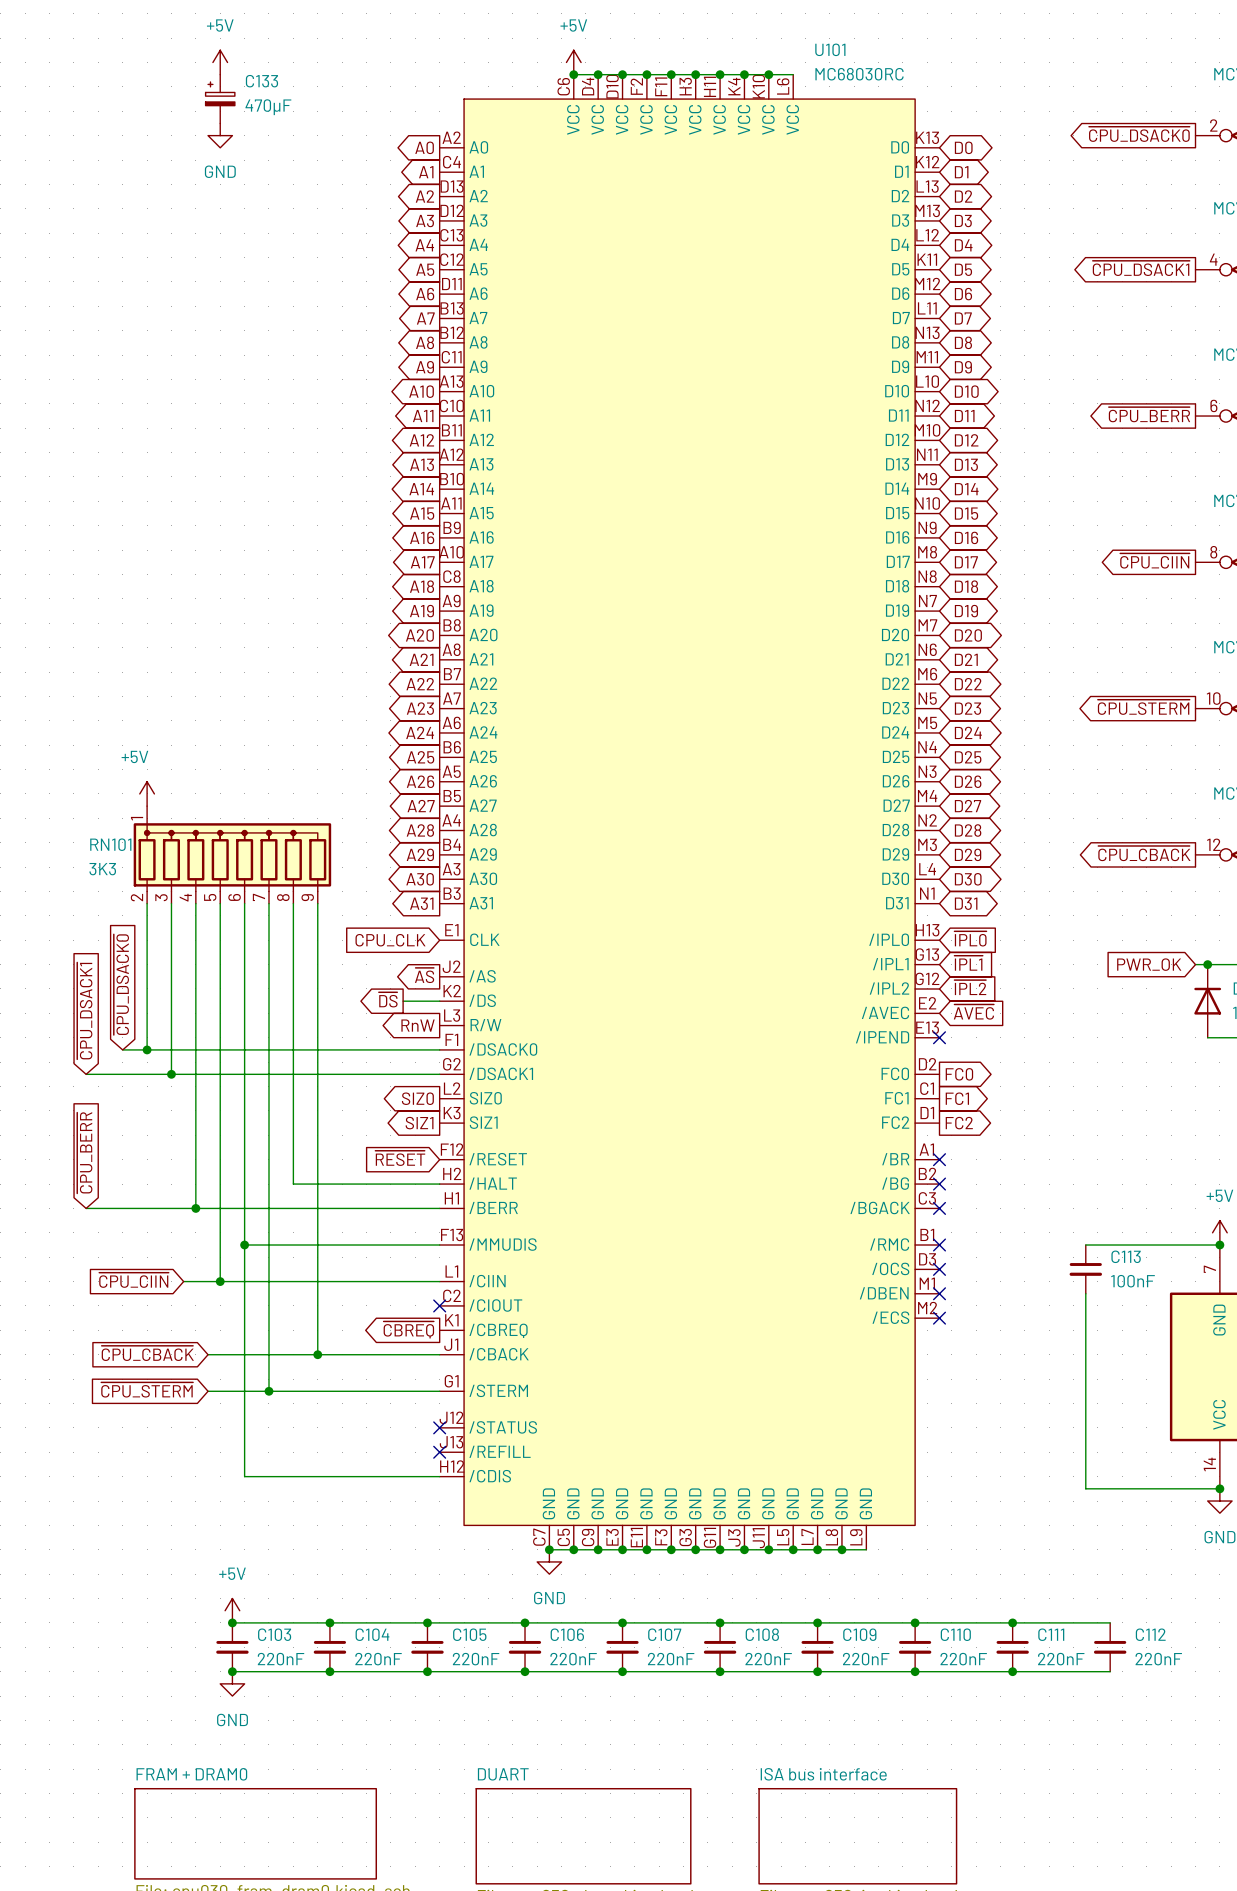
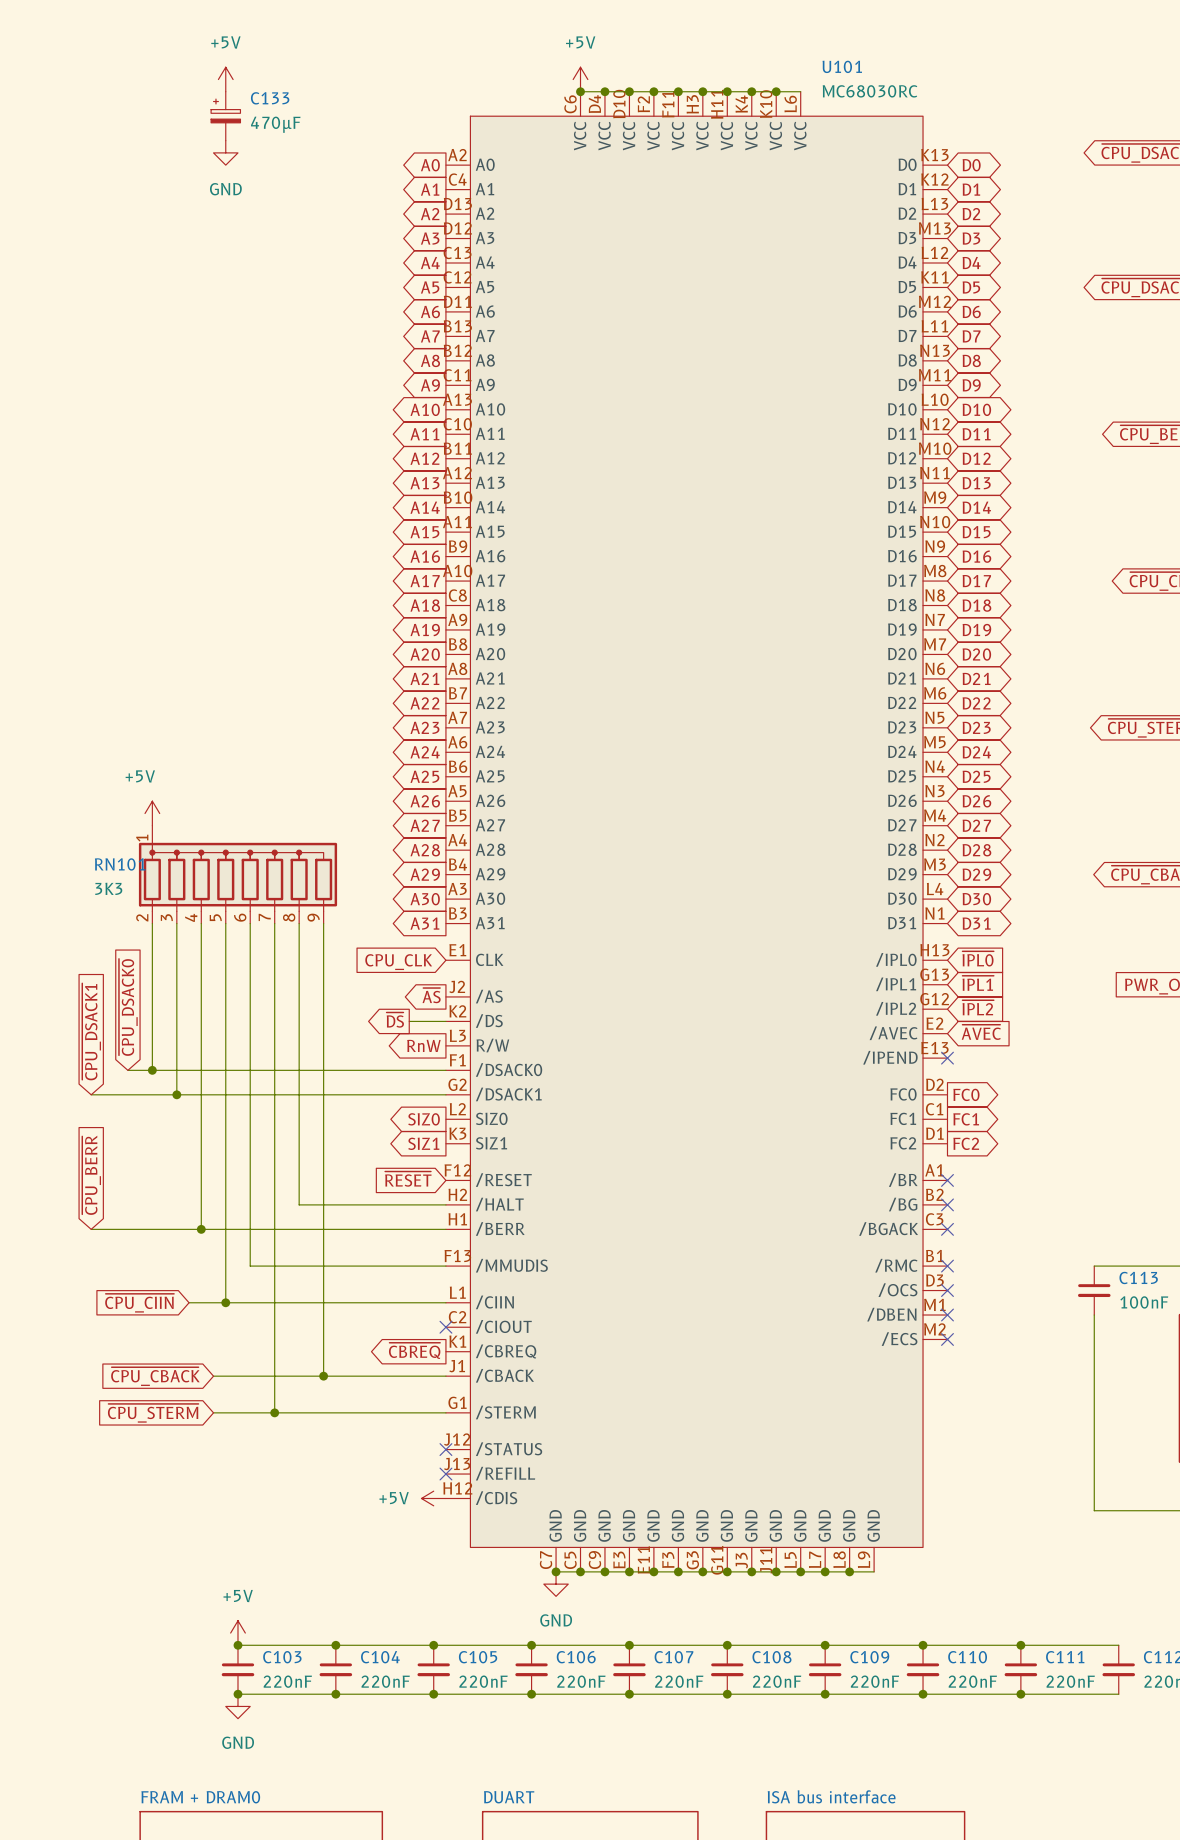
wire: (244, 1245) (244, 1476) (439, 1476) -> none
junction: (244, 1245) -> none
power symbol: none -> +5V (433, 1498)

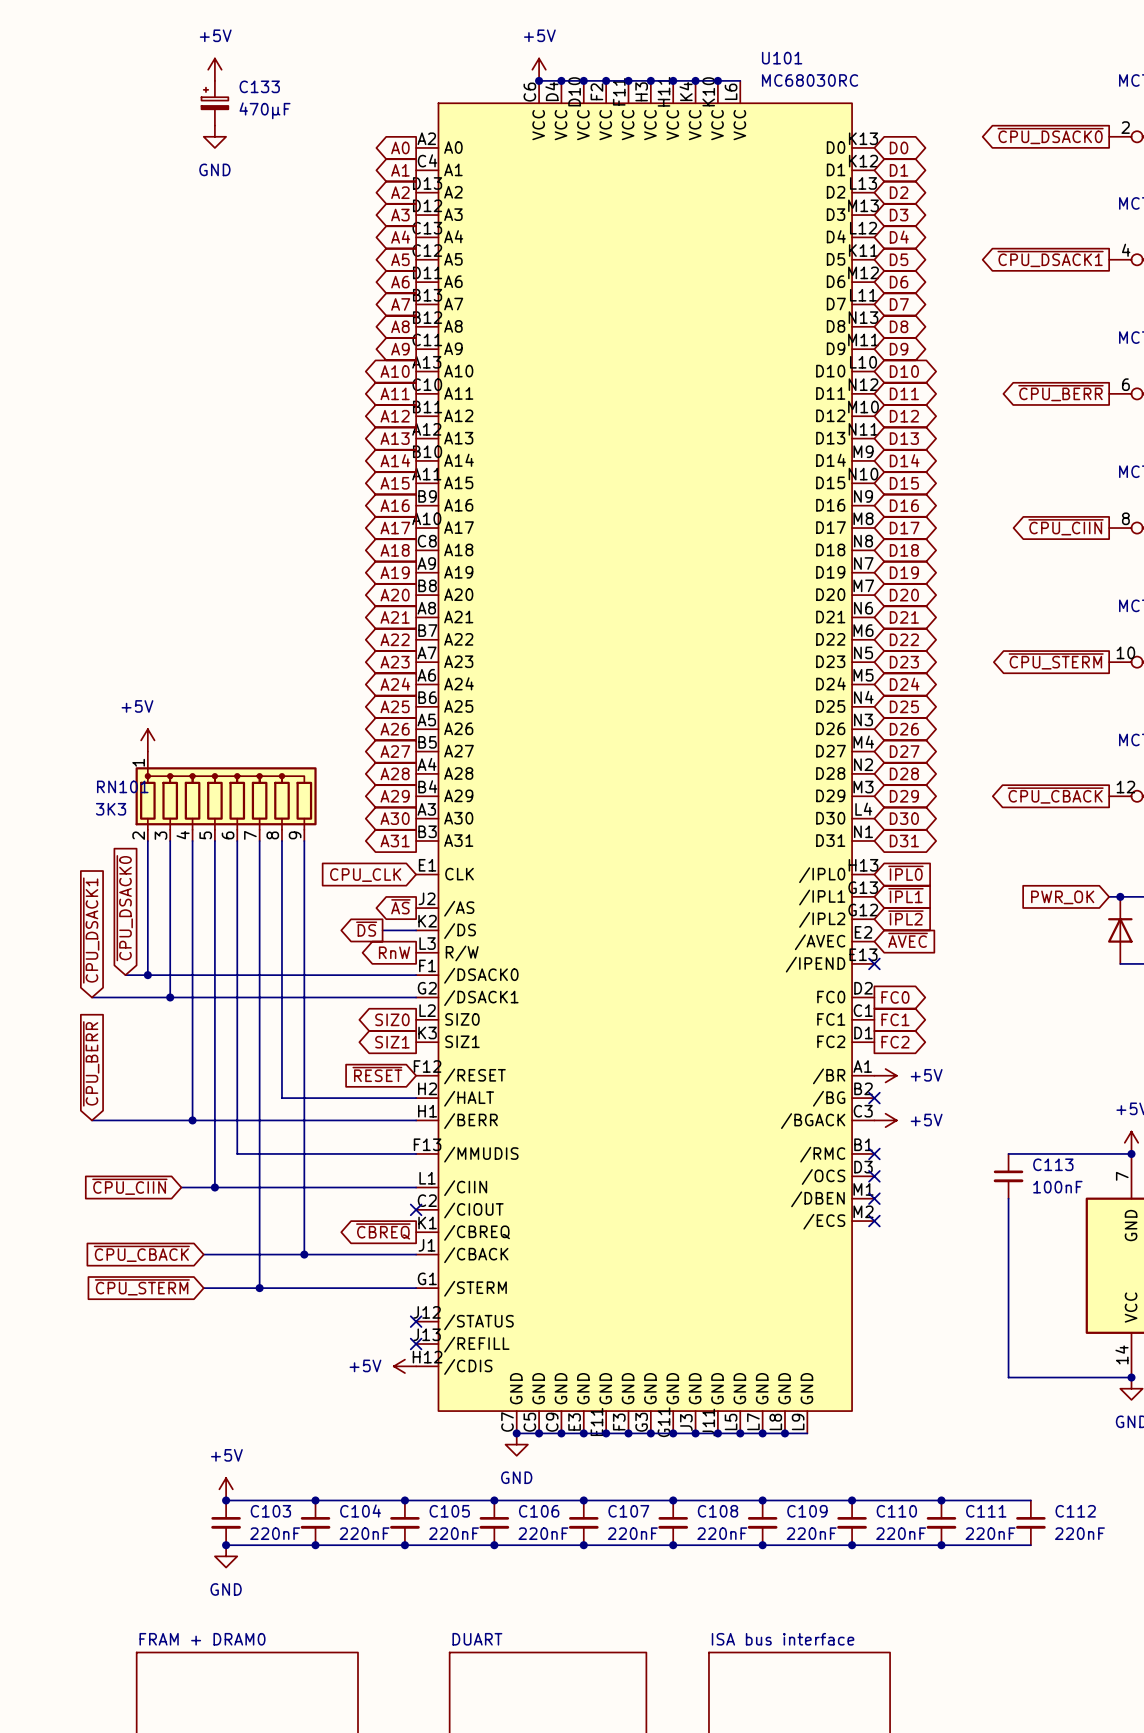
no-connect mark: (947, 1180) -> none
power symbol: none -> +5V (885, 1075)
no-connect mark: (947, 1229) -> none
power symbol: none -> +5V (885, 1120)

